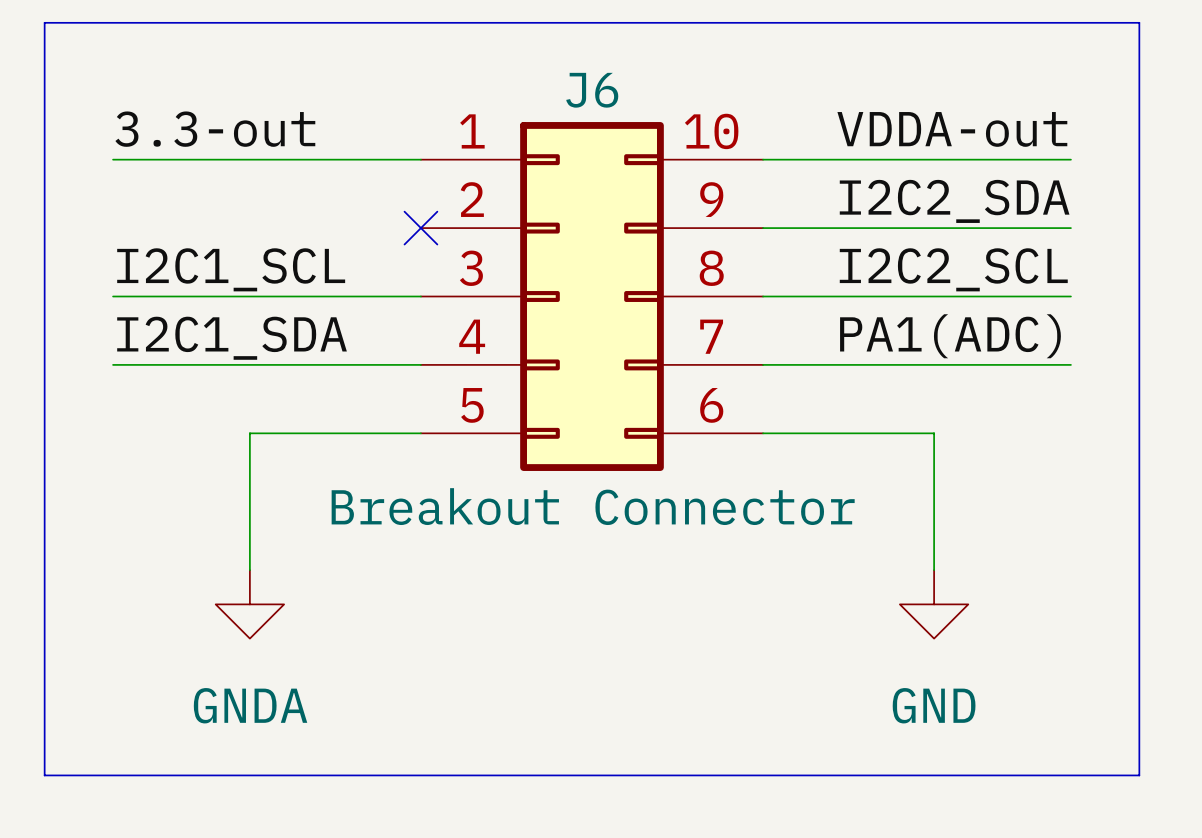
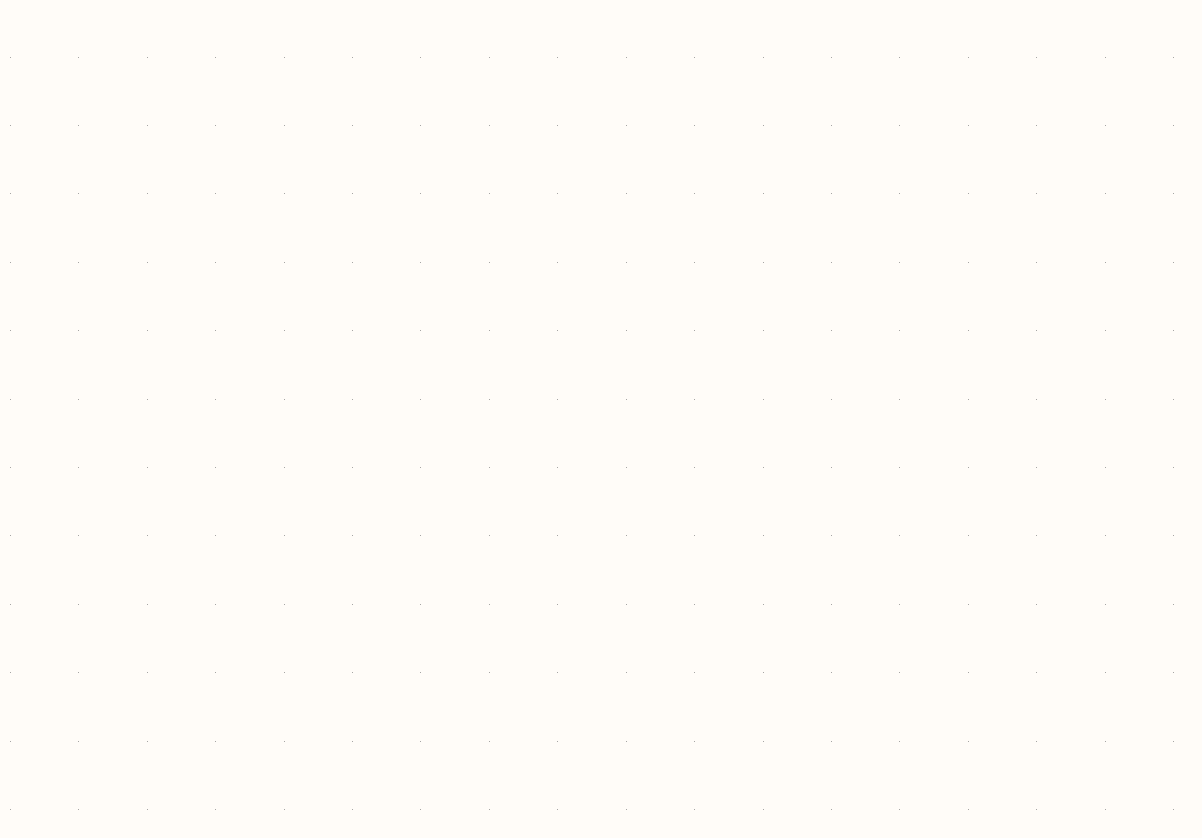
line: (44, 22) (1139, 22) (1139, 775) (44, 775) (44, 22) -> none
label: 3.3-out (215, 129) -> none
label: VDDA-out (952, 129) -> none
wire: (113, 159) (420, 159) -> none
wire: (763, 159) (1070, 159) -> none
label: I2C2_SDA (954, 201) -> none
no-connect mark: (420, 228) -> none
wire: (763, 228) (1070, 228) -> none
label: I2C1_SCL (231, 269) -> none
label: I2C2_SCL (953, 269) -> none
wire: (113, 296) (420, 296) -> none
J6: Breakout Connector (591, 296) -> none
wire: (763, 296) (1070, 296) -> none
label: PA1(ADC) (950, 336) -> none
label: I2C1_SDA (232, 338) -> none
wire: (113, 364) (420, 364) -> none
wire: (763, 364) (1070, 364) -> none
wire: (420, 433) (249, 433) (249, 570) -> none
wire: (763, 433) (934, 433) (934, 570) -> none
power symbol: GNDA (249, 604) -> none
power symbol: GND (934, 604) -> none

